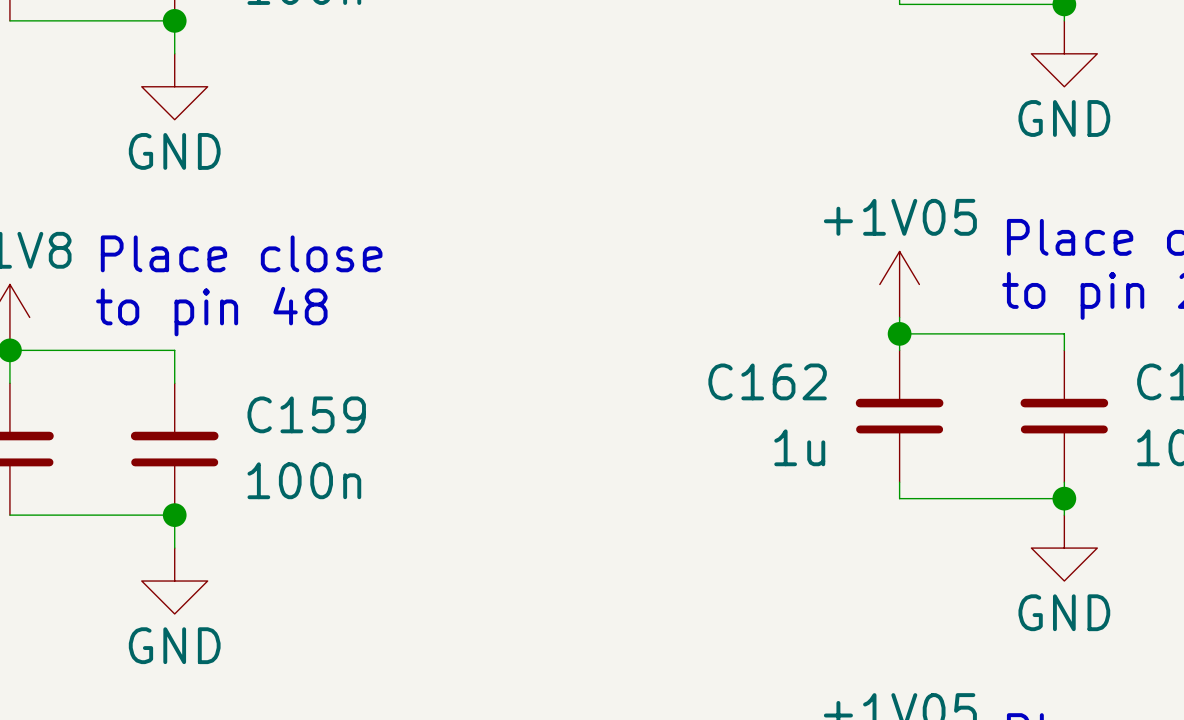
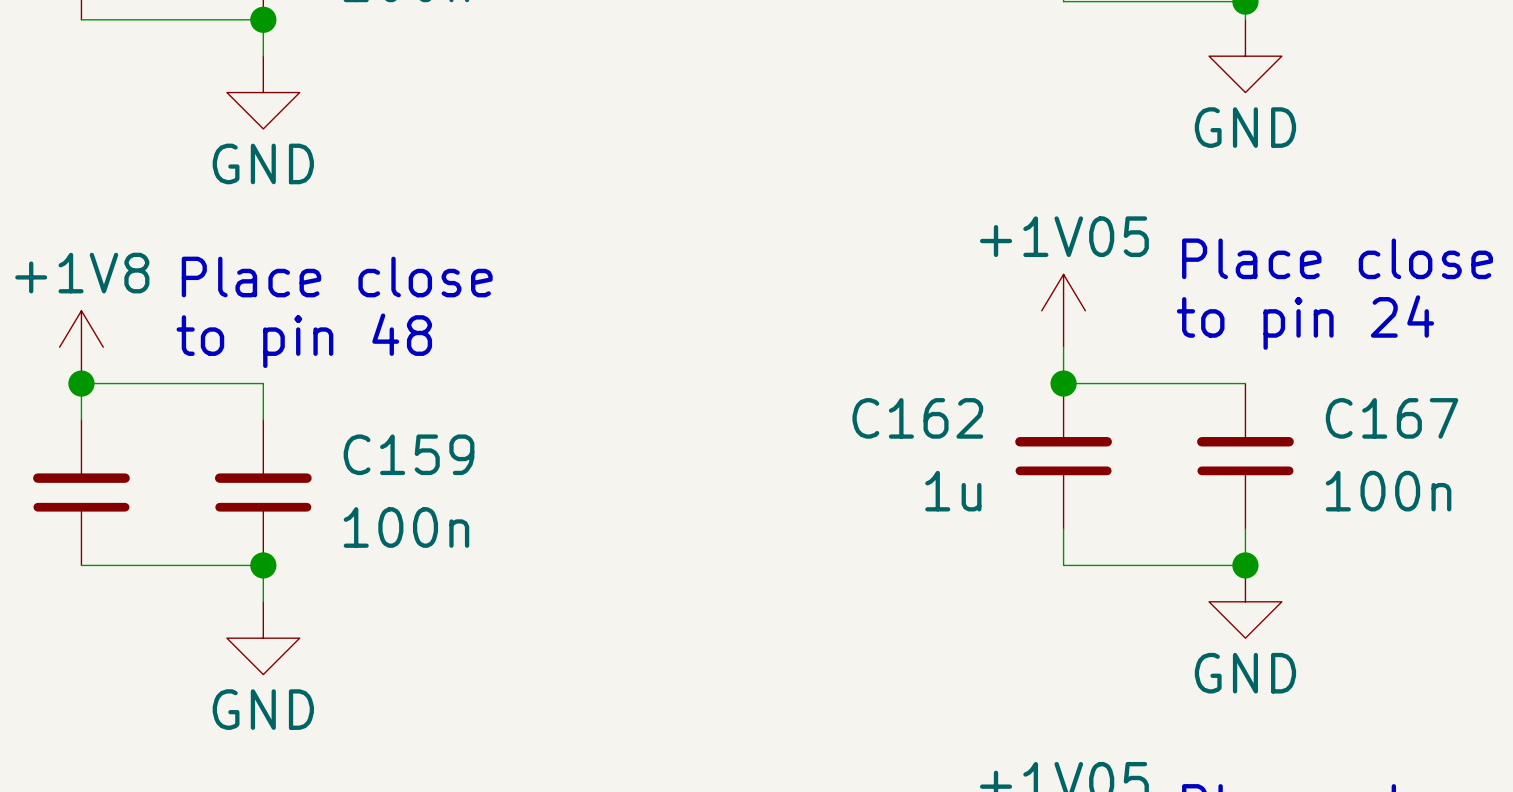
wire: (899, 333) (1064, 333) (1064, 350) -> (1063, 383) (1245, 383)
junction position: (899, 333) -> (1063, 383)
wire: (899, 498) (1064, 498) -> (1063, 547) (1063, 565) (1245, 565)
junction position: (1064, 498) -> (1245, 565)

